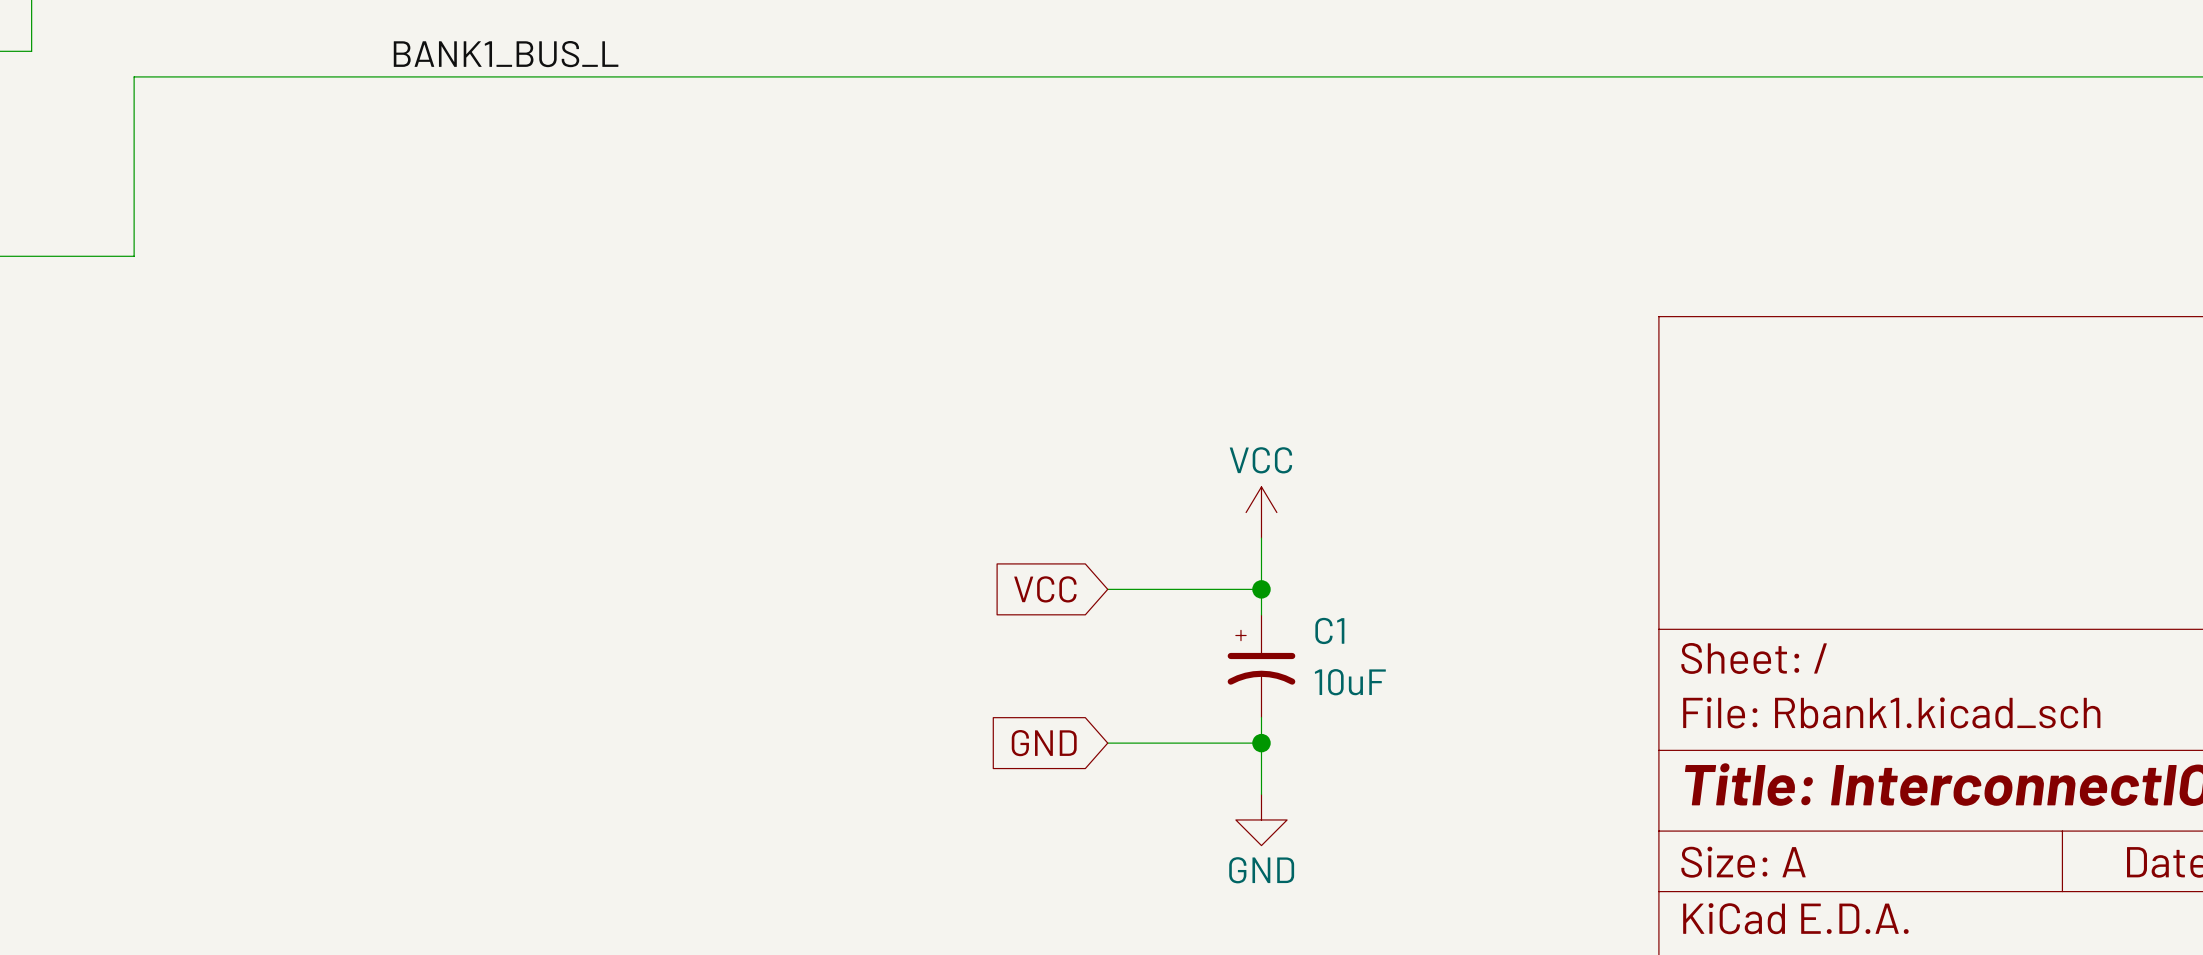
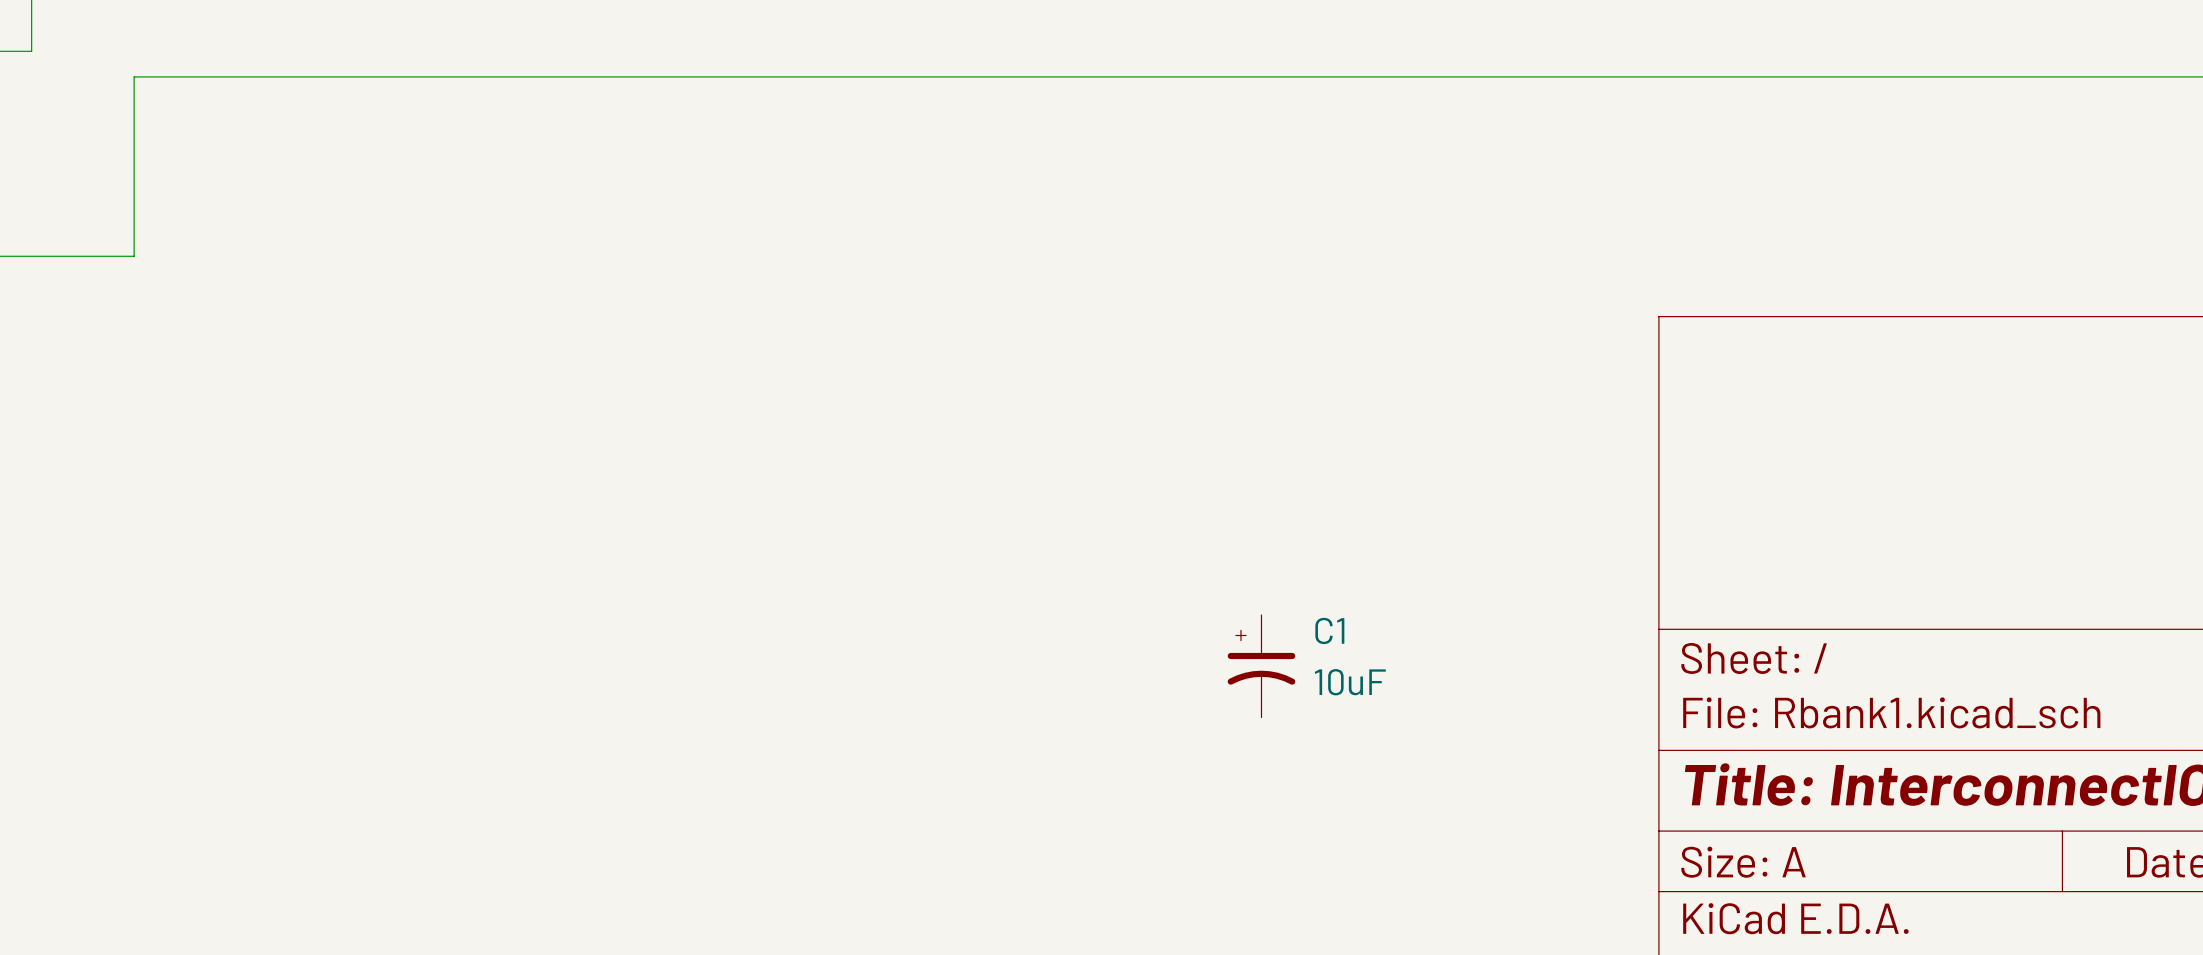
label: BANK1_BUS_L (506, 54) -> none
power symbol: VCC (1261, 512) -> none
wire: (1261, 538) (1261, 615) -> none
global label: VCC (1045, 589) -> none
wire: (1107, 589) (1261, 589) -> none
junction: (1261, 589) -> none
wire: (1261, 717) (1261, 794) -> none
global label: GND (1044, 743) -> none
wire: (1107, 743) (1261, 743) -> none
junction: (1261, 743) -> none
power symbol: GND (1261, 819) -> none

